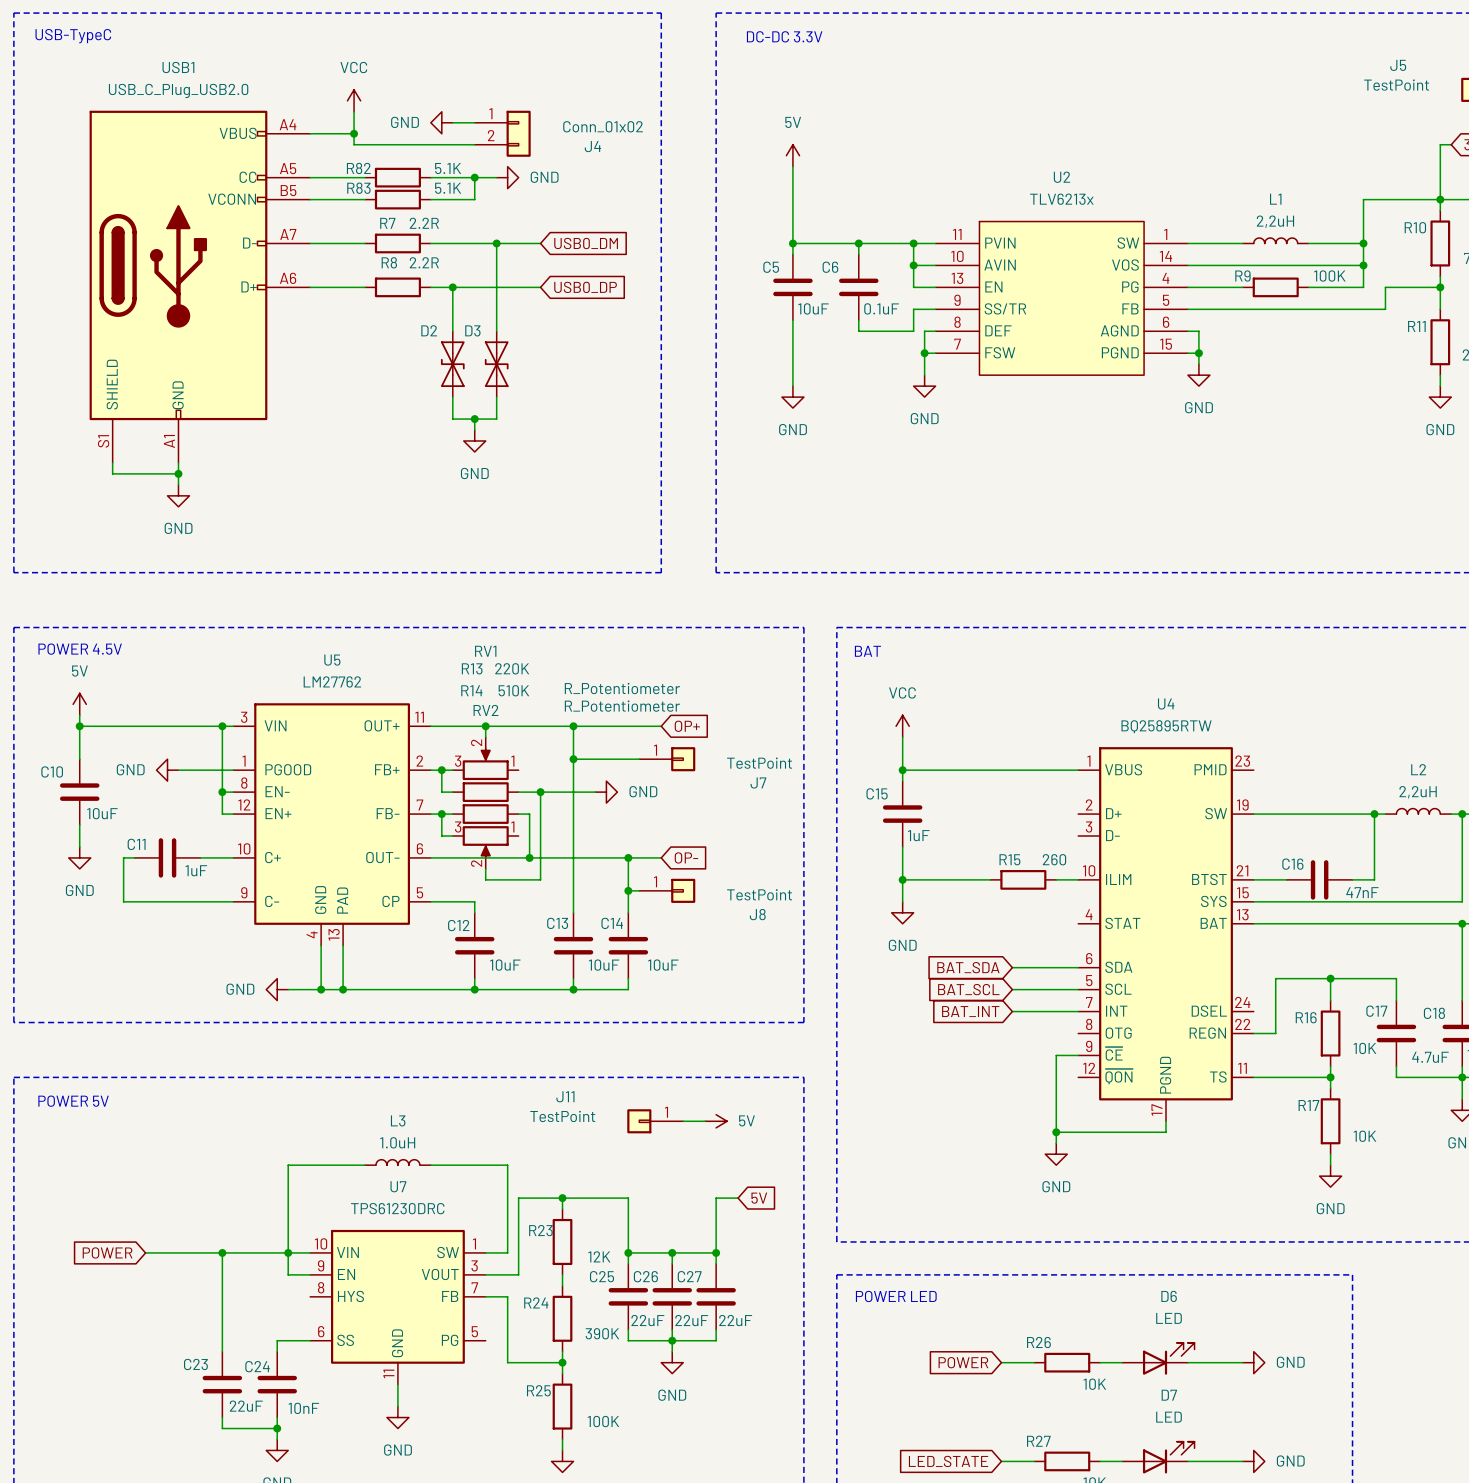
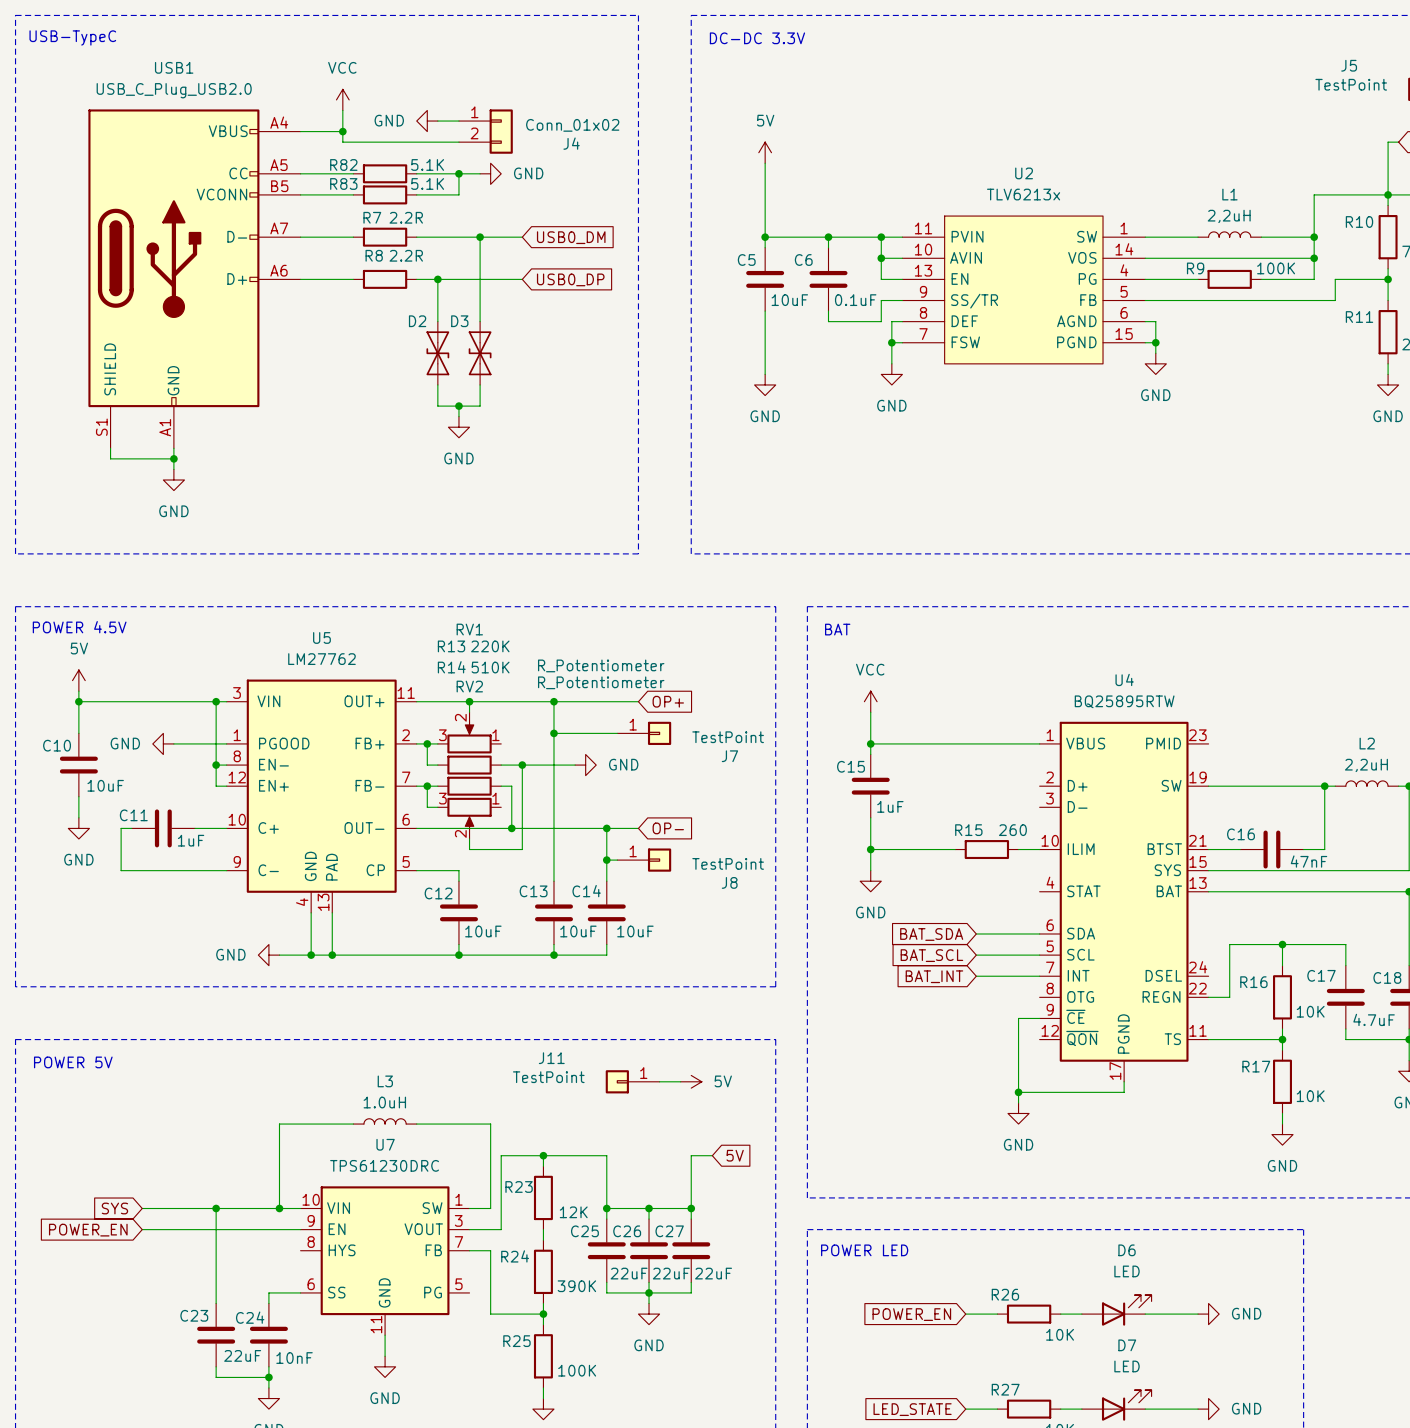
global label: POWER (107, 1252) -> SYS (114, 1208)
wire: (288, 1252) (288, 1274) -> (142, 1229) (279, 1229)
global label: none -> POWER_EN (88, 1230)
global label: POWER (963, 1362) -> POWER_EN (911, 1314)

